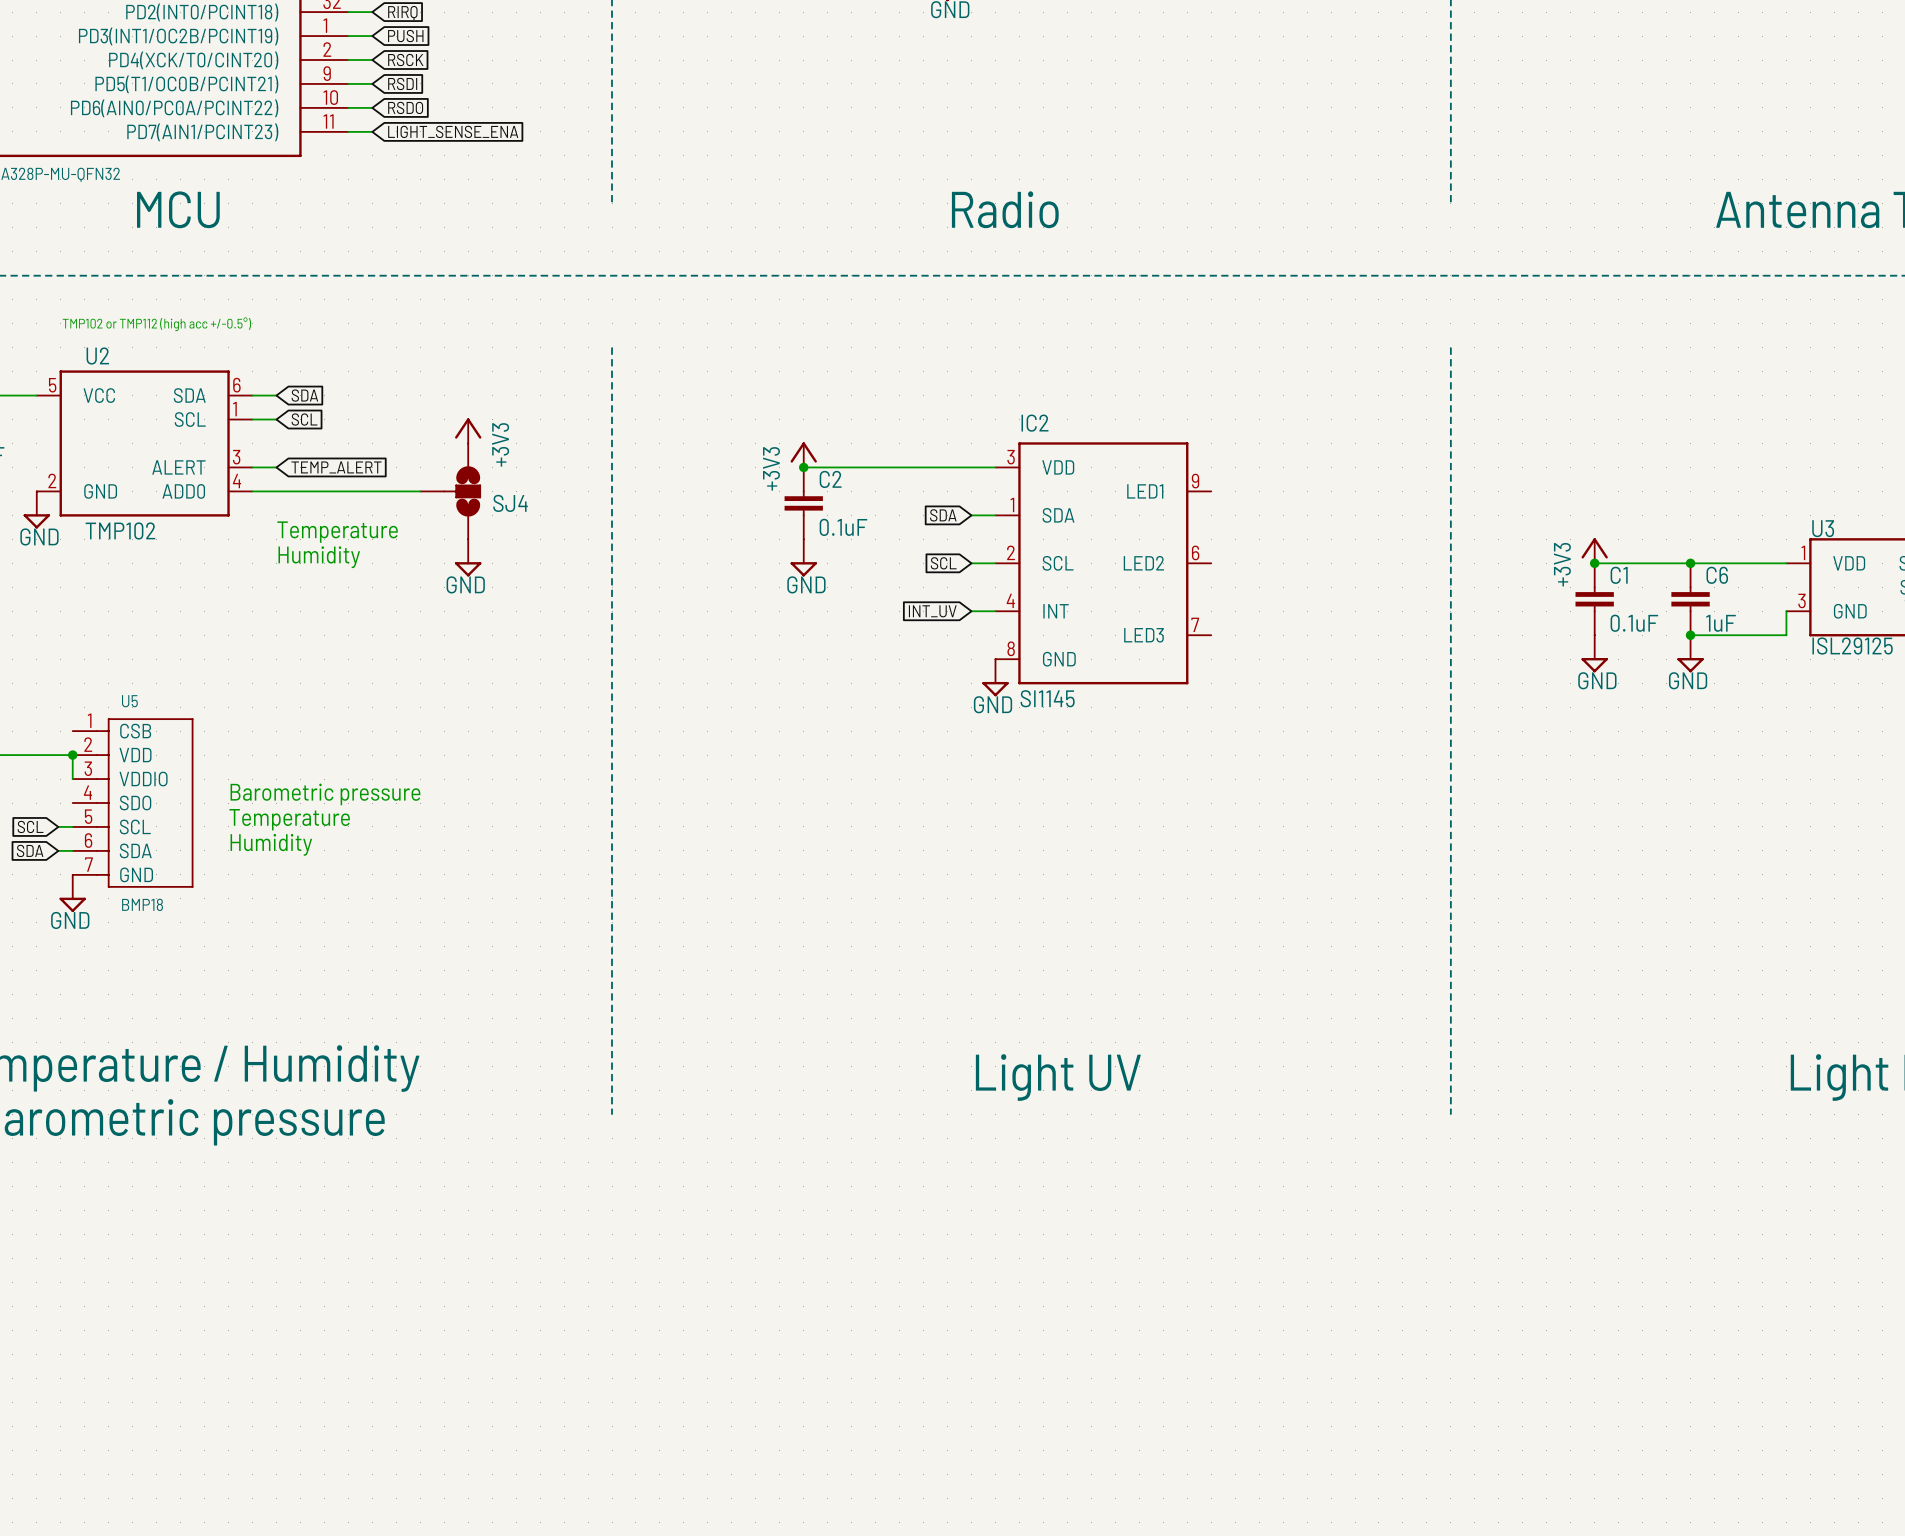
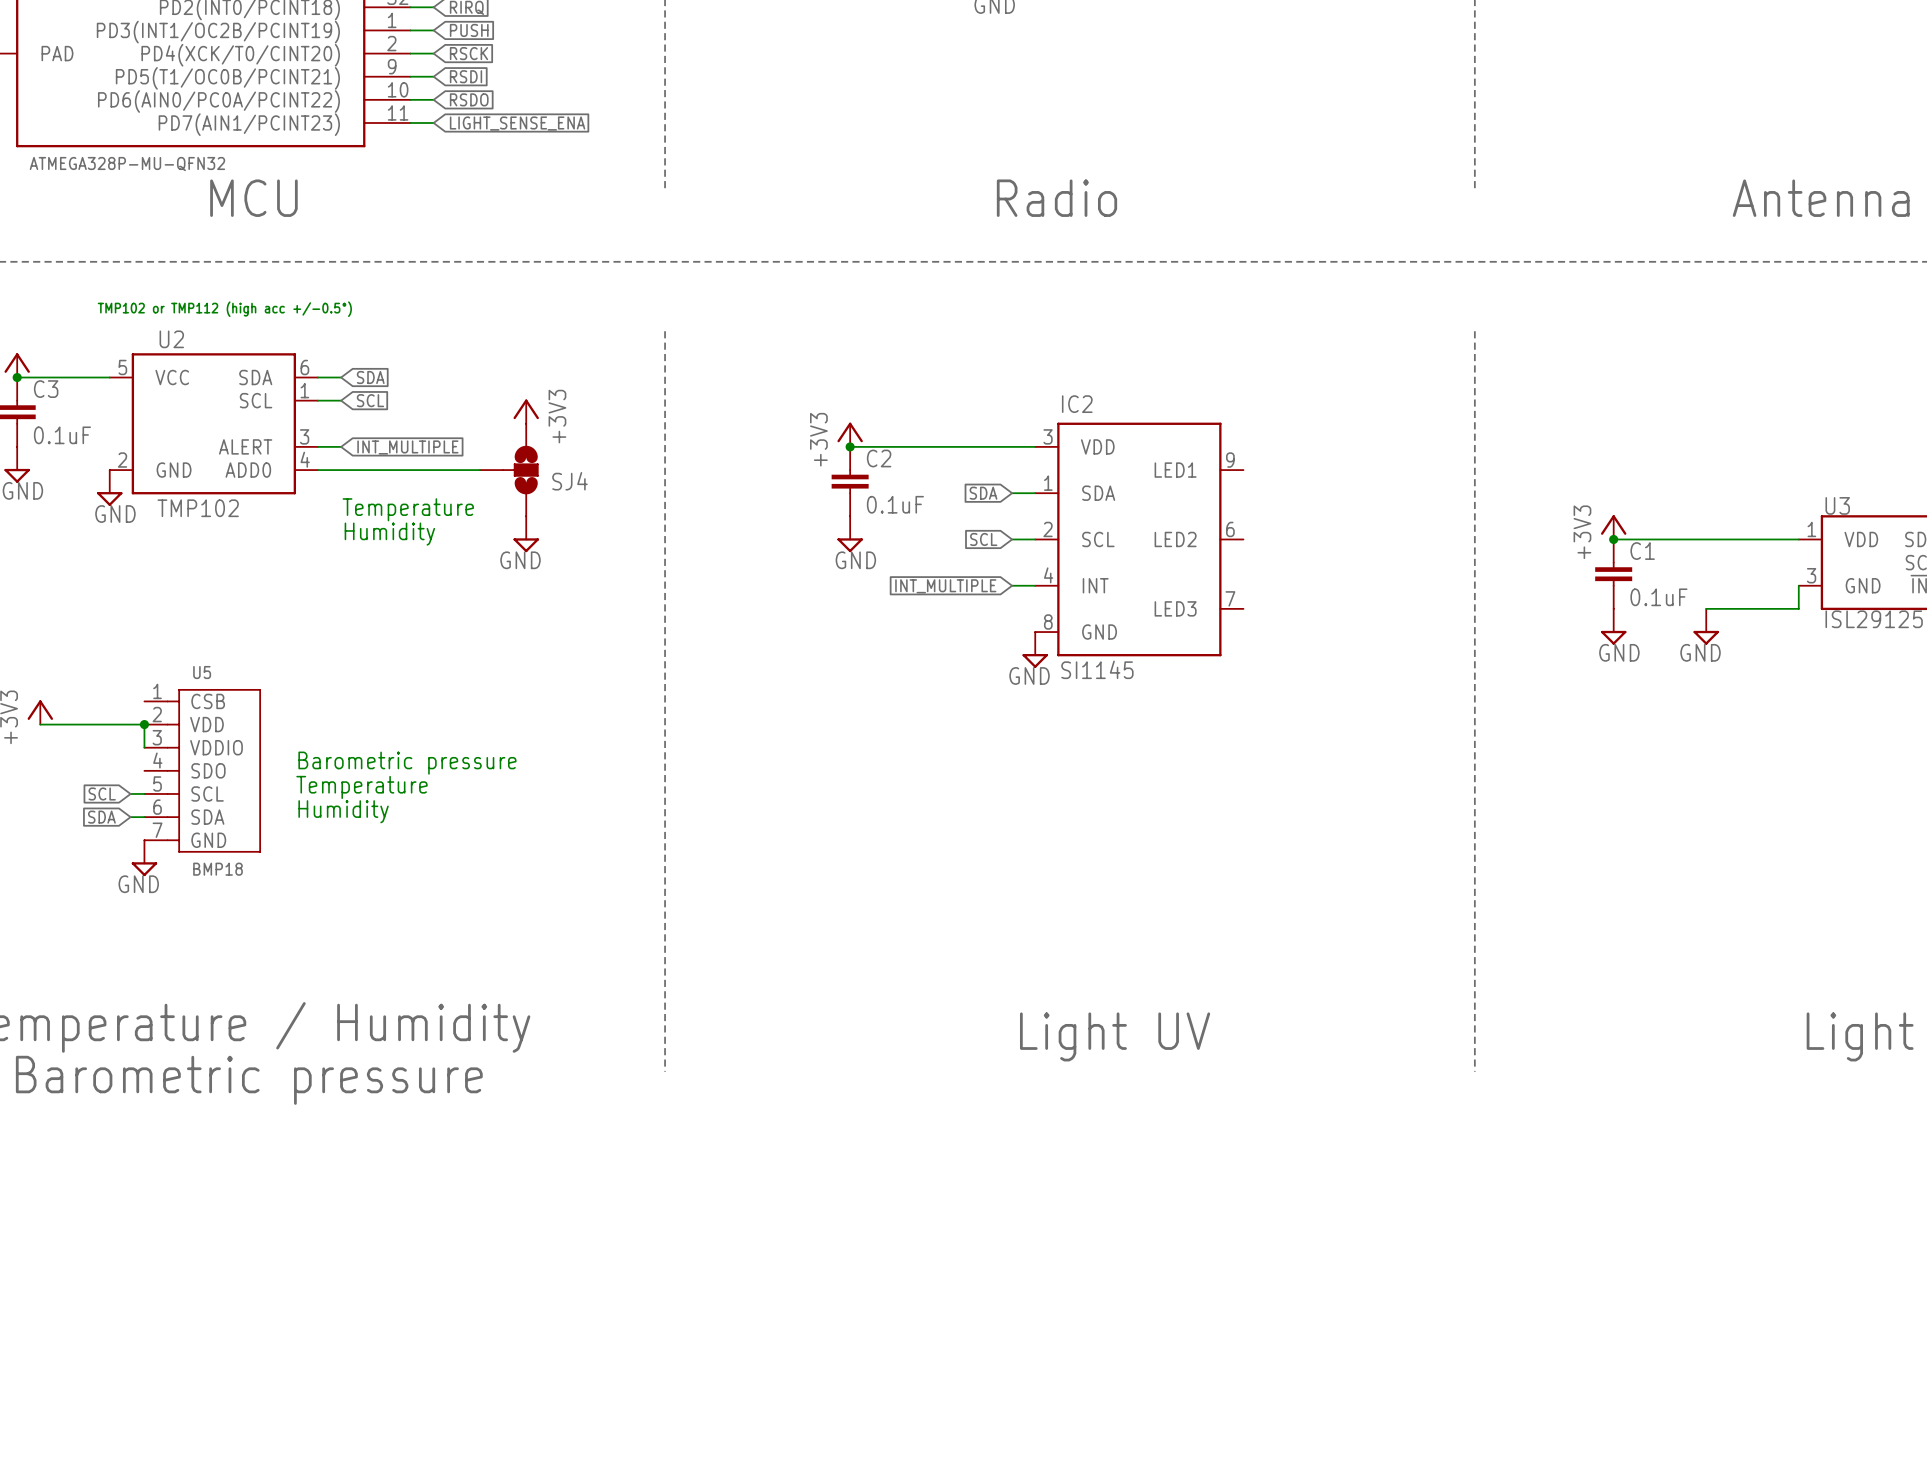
global label: TEMP_ALERT (336, 467) -> INT_MULTIPLE (407, 447)
junction: (1690, 563) -> none
C6: 1uF (1690, 599) -> none
global label: INT_UV (932, 611) -> INT_MULTIPLE (945, 586)
junction: (1690, 635) -> none

